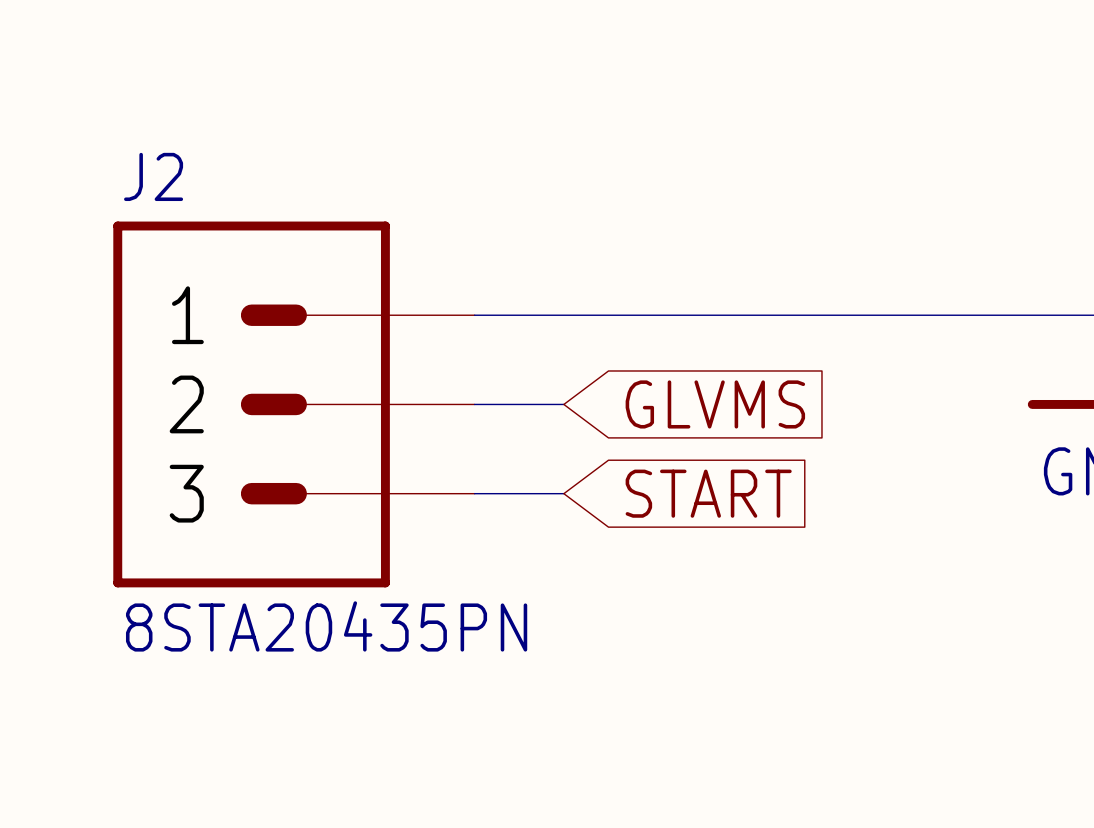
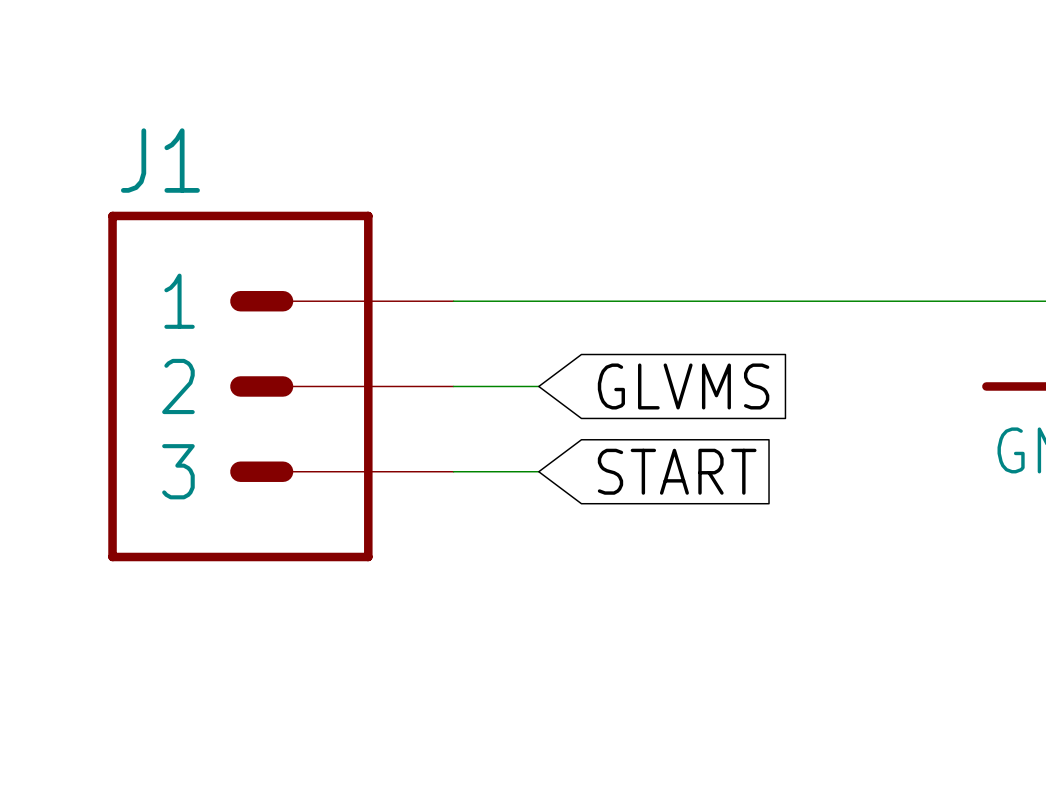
J2 name: J2 (153, 176) -> J1 (160, 160)
J2 text: 8STA20435PN (326, 626) -> none

